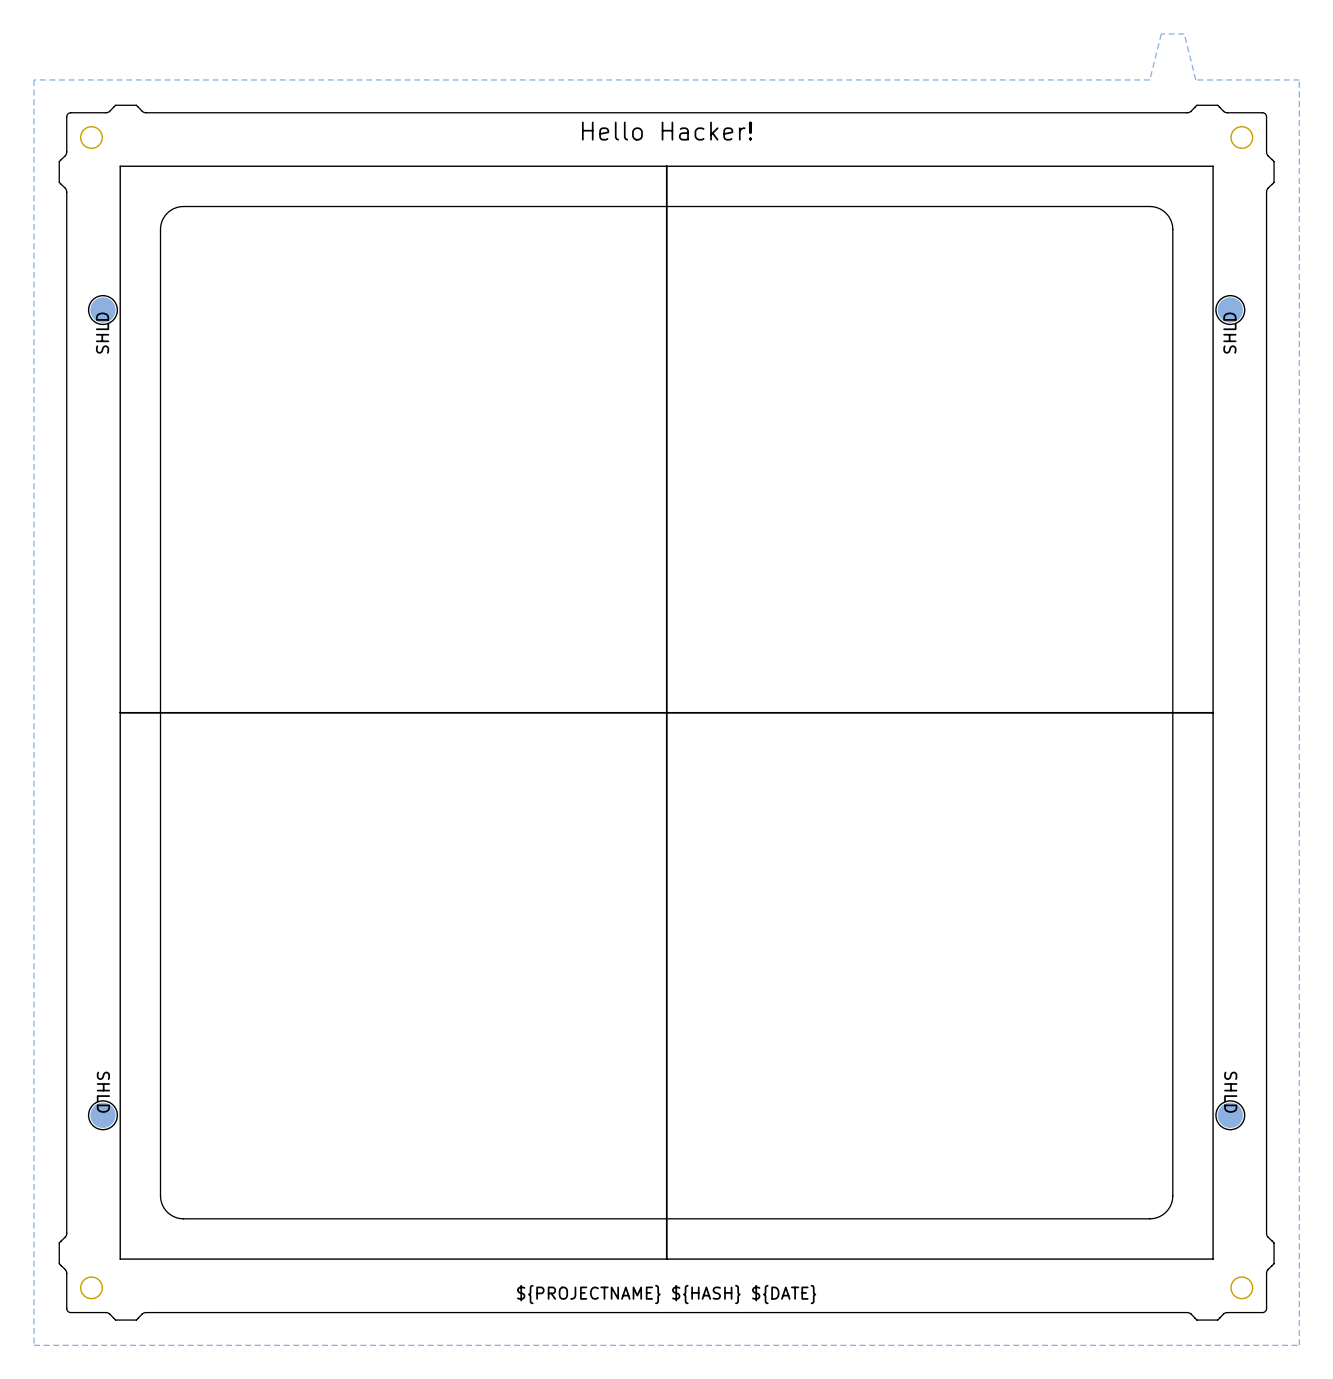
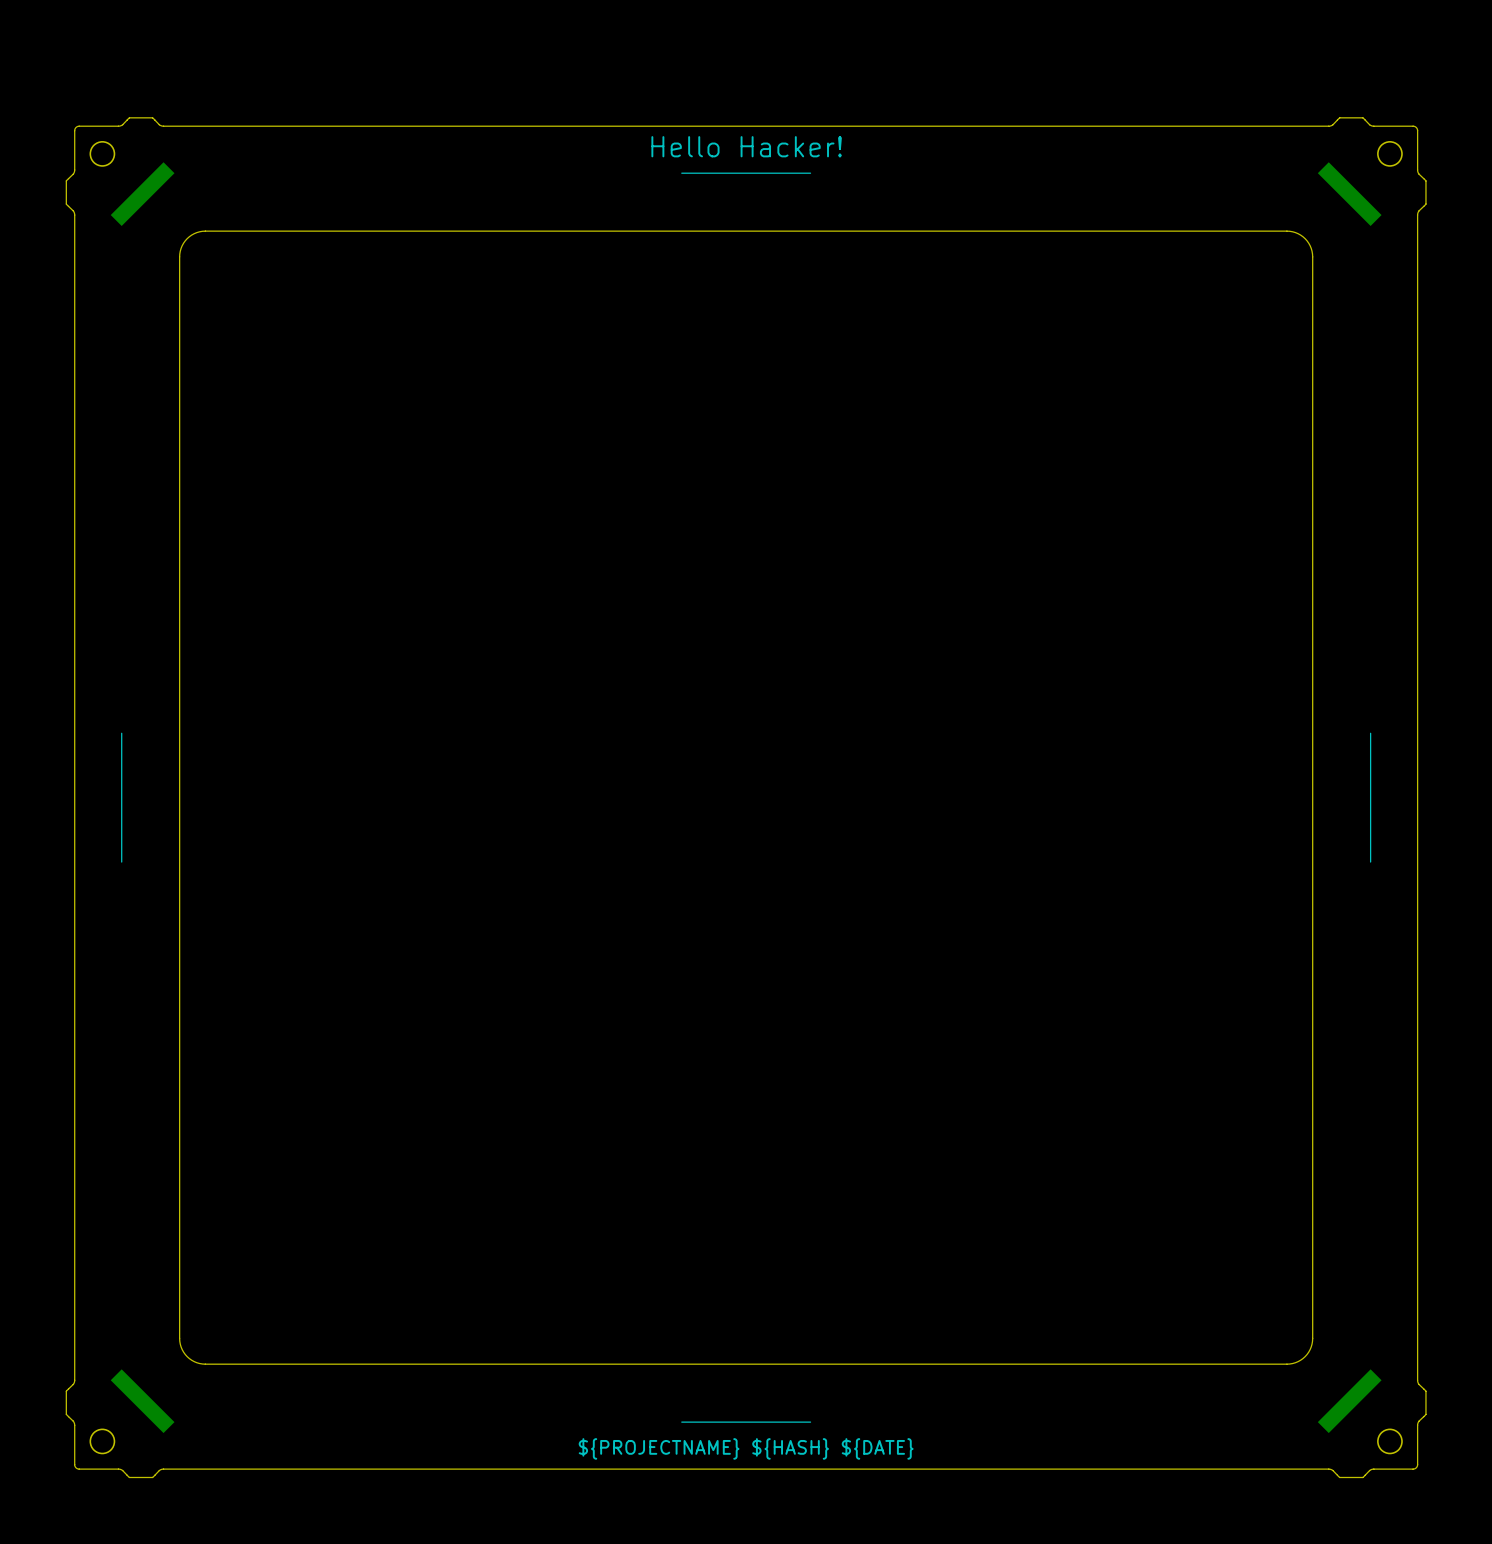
zone outline: (1184, 33) (1195, 79) (1299, 79) (1299, 1345) (33, 1345) (33, 79) (1149, 79) (1161, 33) (1184, 33) -> none
drawing: none -> [110, 162, 175, 226]
drawing: none -> [1317, 162, 1382, 226]
line: none -> (810, 173) (681, 173)
line: (666, 166) (666, 1259) -> none
line: (1213, 166) (120, 166) (120, 1259) (1213, 1259) (1213, 166) -> none
drawing: [87, 294, 119, 326] -> none
drawing: [1215, 294, 1246, 326] -> none
text: SHLD (102, 333) -> none
text: SHLD (1229, 333) -> none
line: none -> (121, 733) (121, 862)
line: none -> (1370, 733) (1370, 862)
line: (1213, 712) (120, 712) -> none
text: SHLD (103, 1092) -> none
text: SHLD (1230, 1092) -> none
drawing: [87, 1100, 119, 1131] -> none
drawing: [1215, 1100, 1246, 1131] -> none
drawing: none -> [110, 1369, 175, 1434]
drawing: none -> [1317, 1369, 1382, 1434]
line: none -> (810, 1422) (681, 1422)

